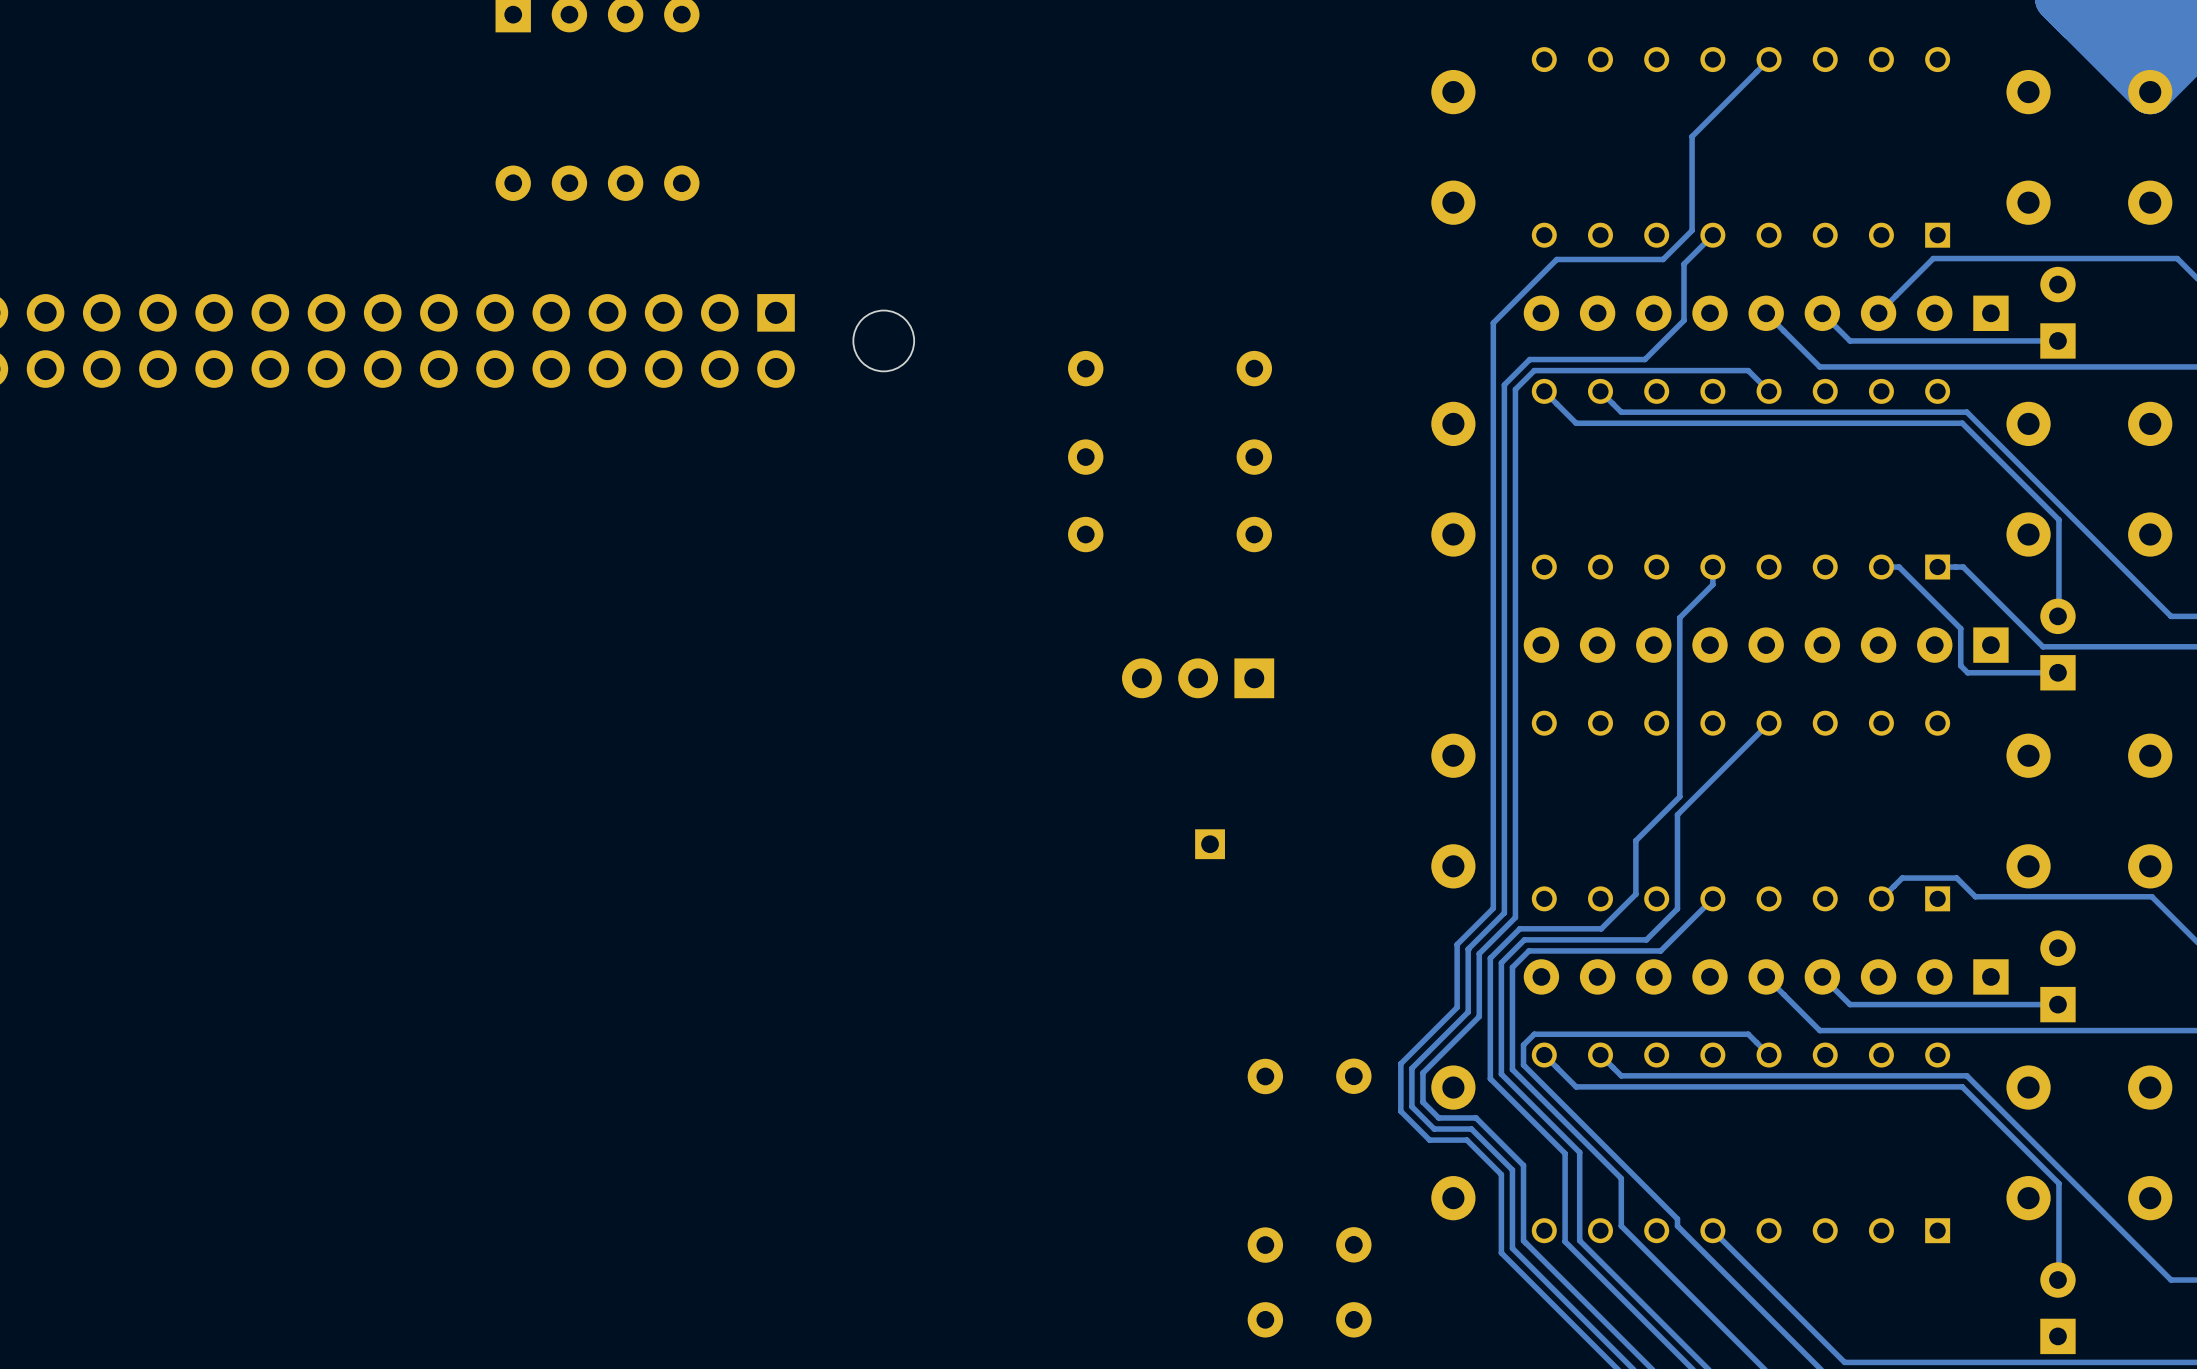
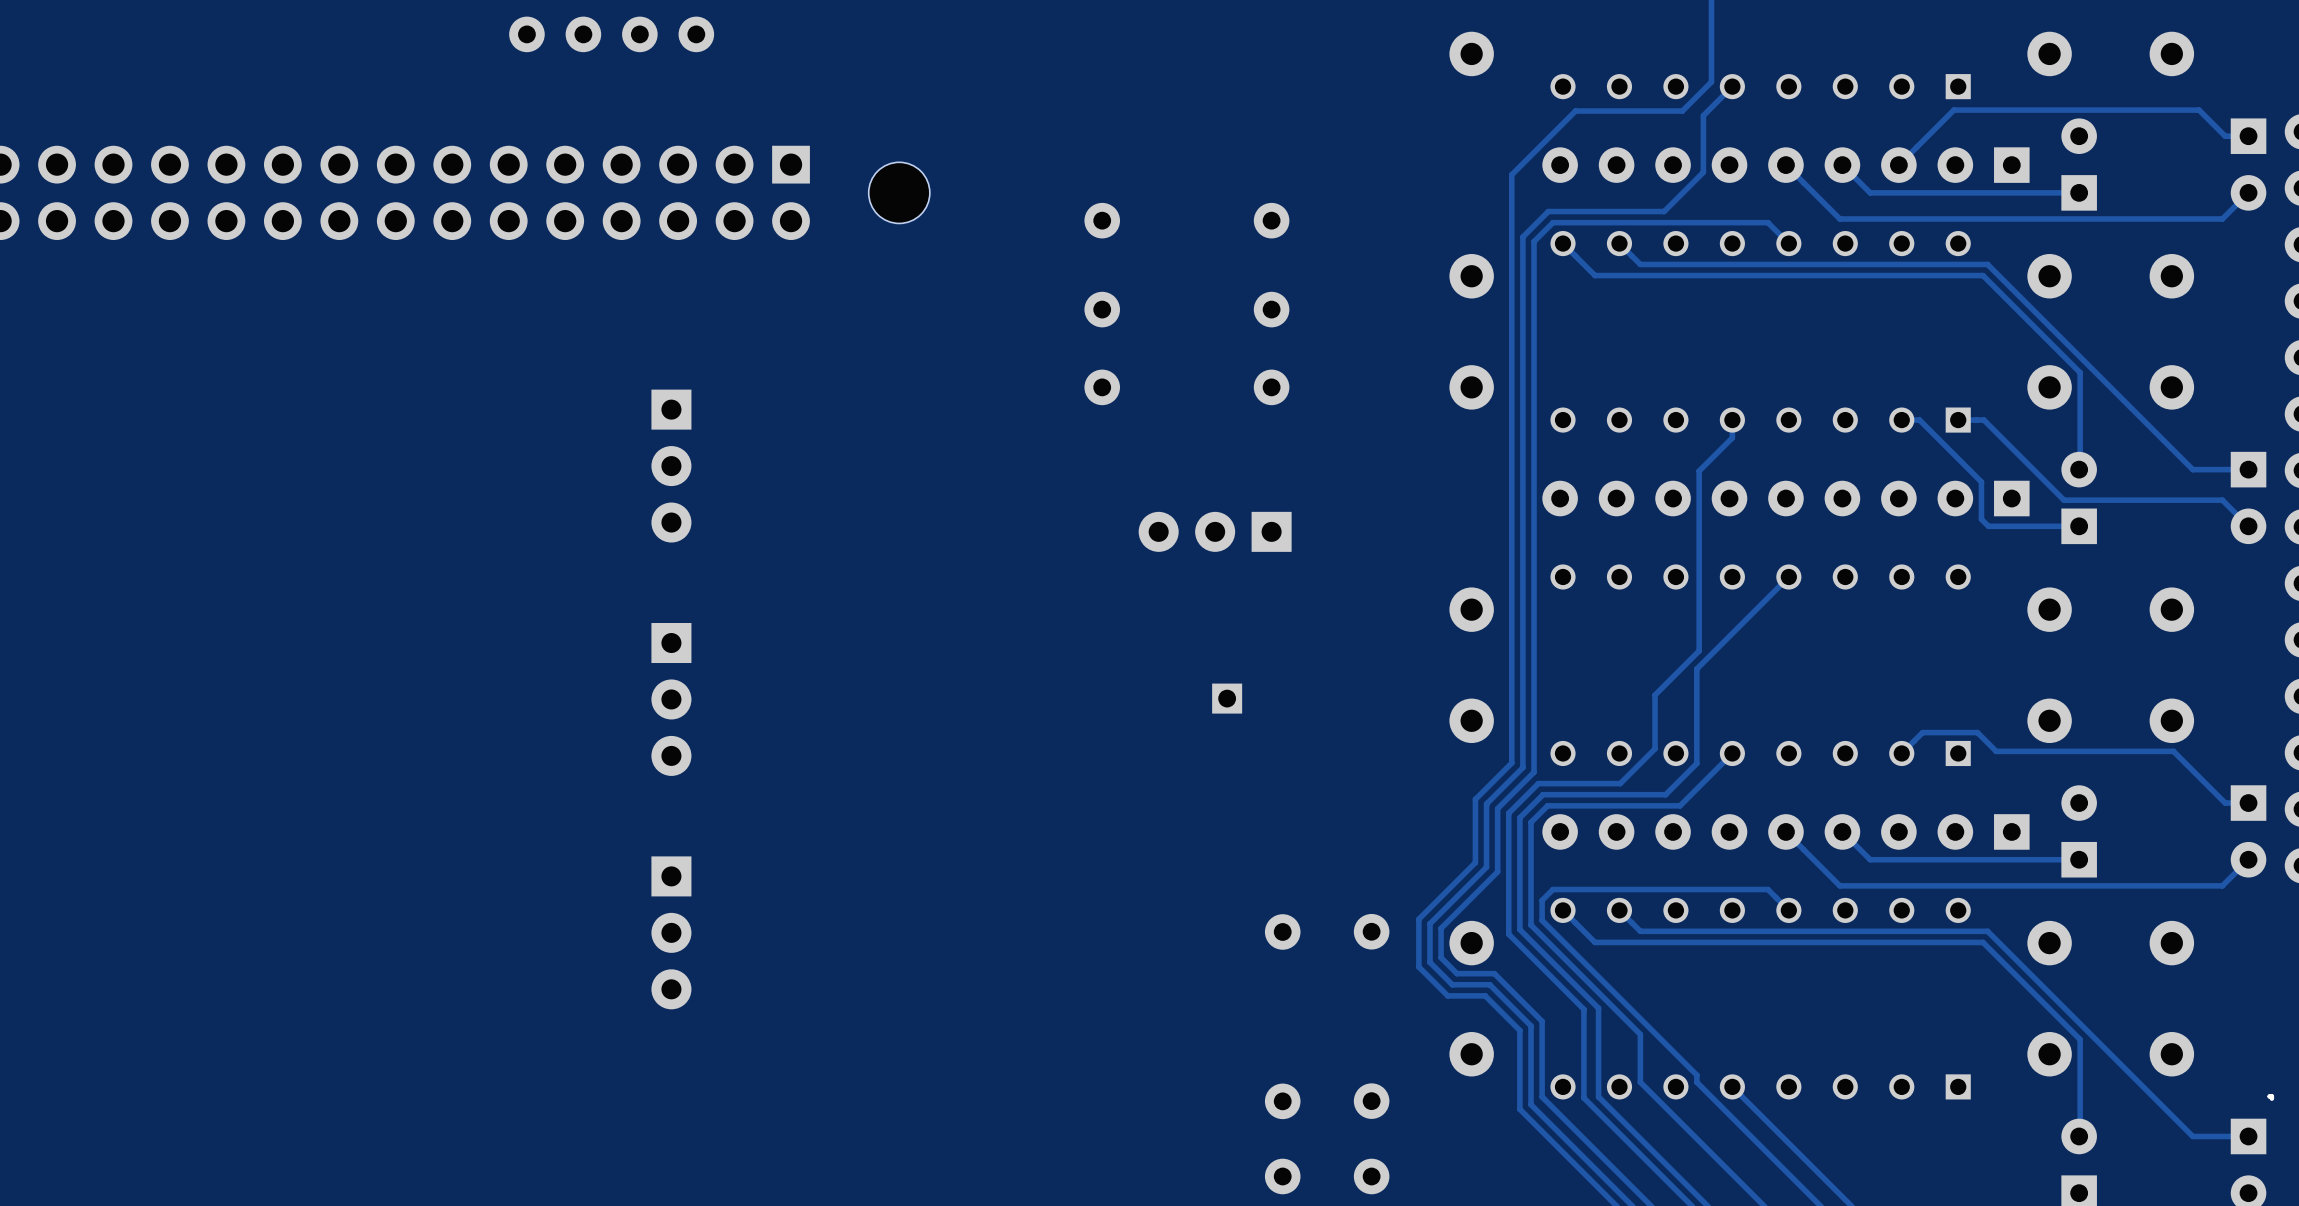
part: none -> (671, 466)
part: none -> (671, 699)
part: none -> (671, 932)

